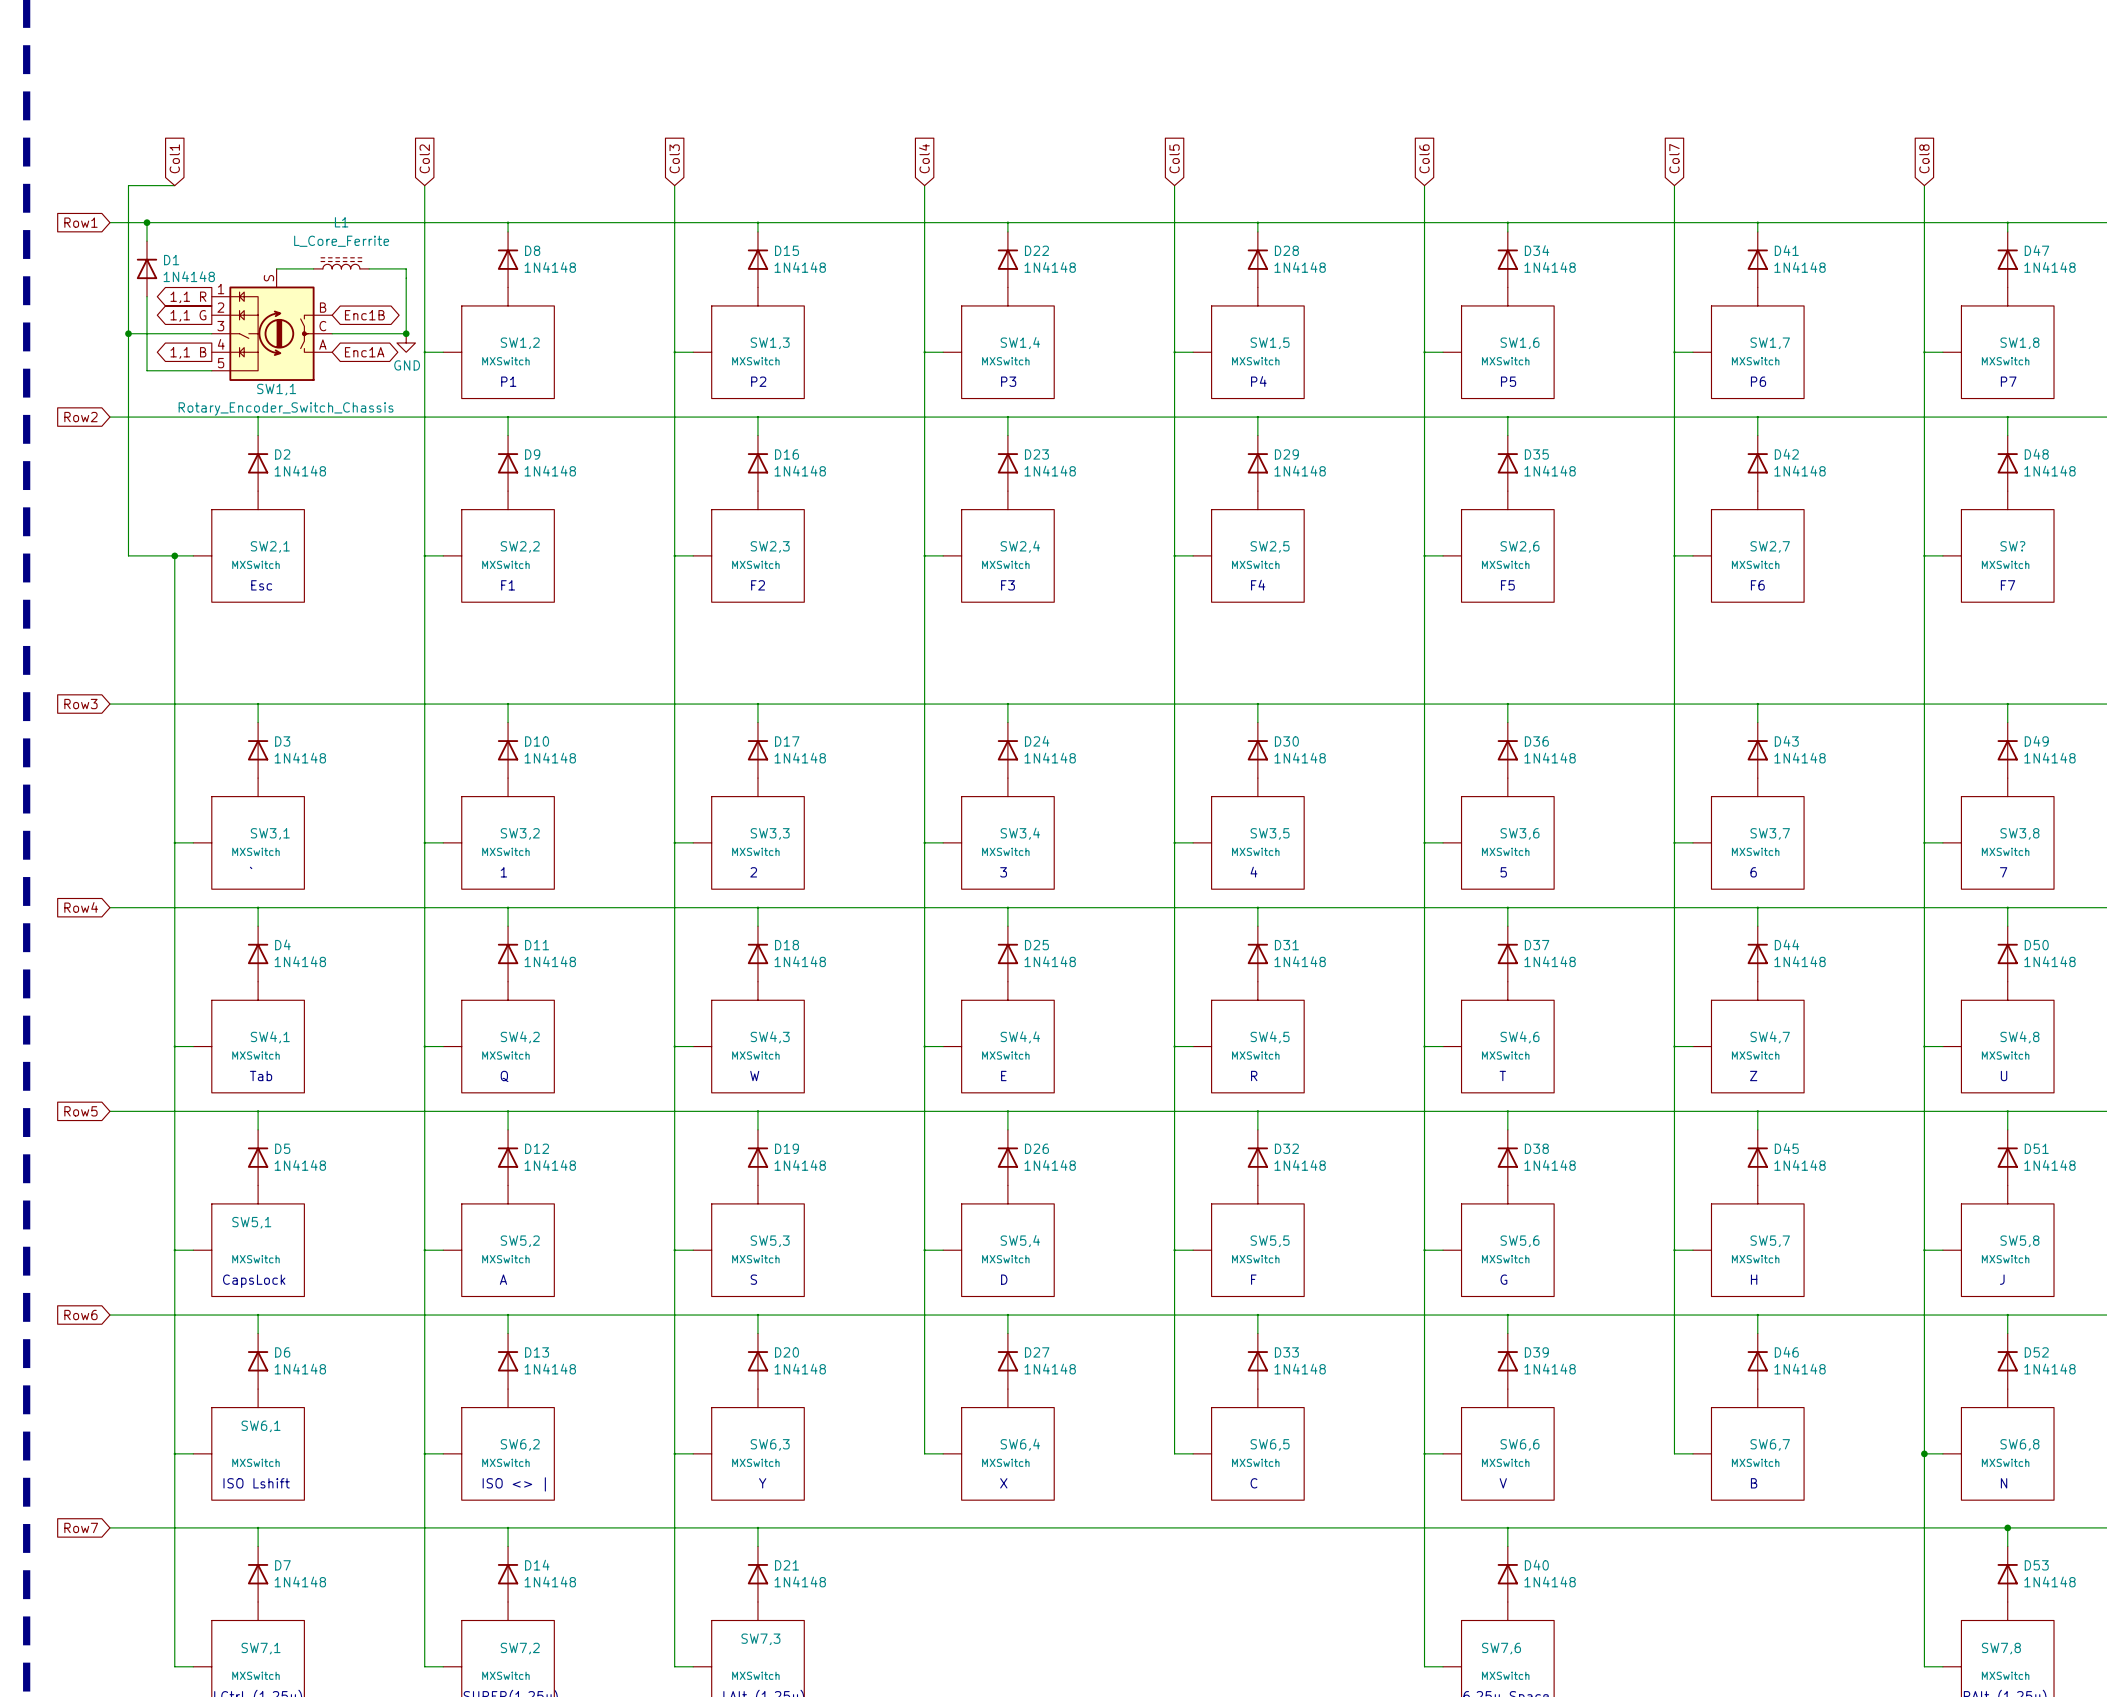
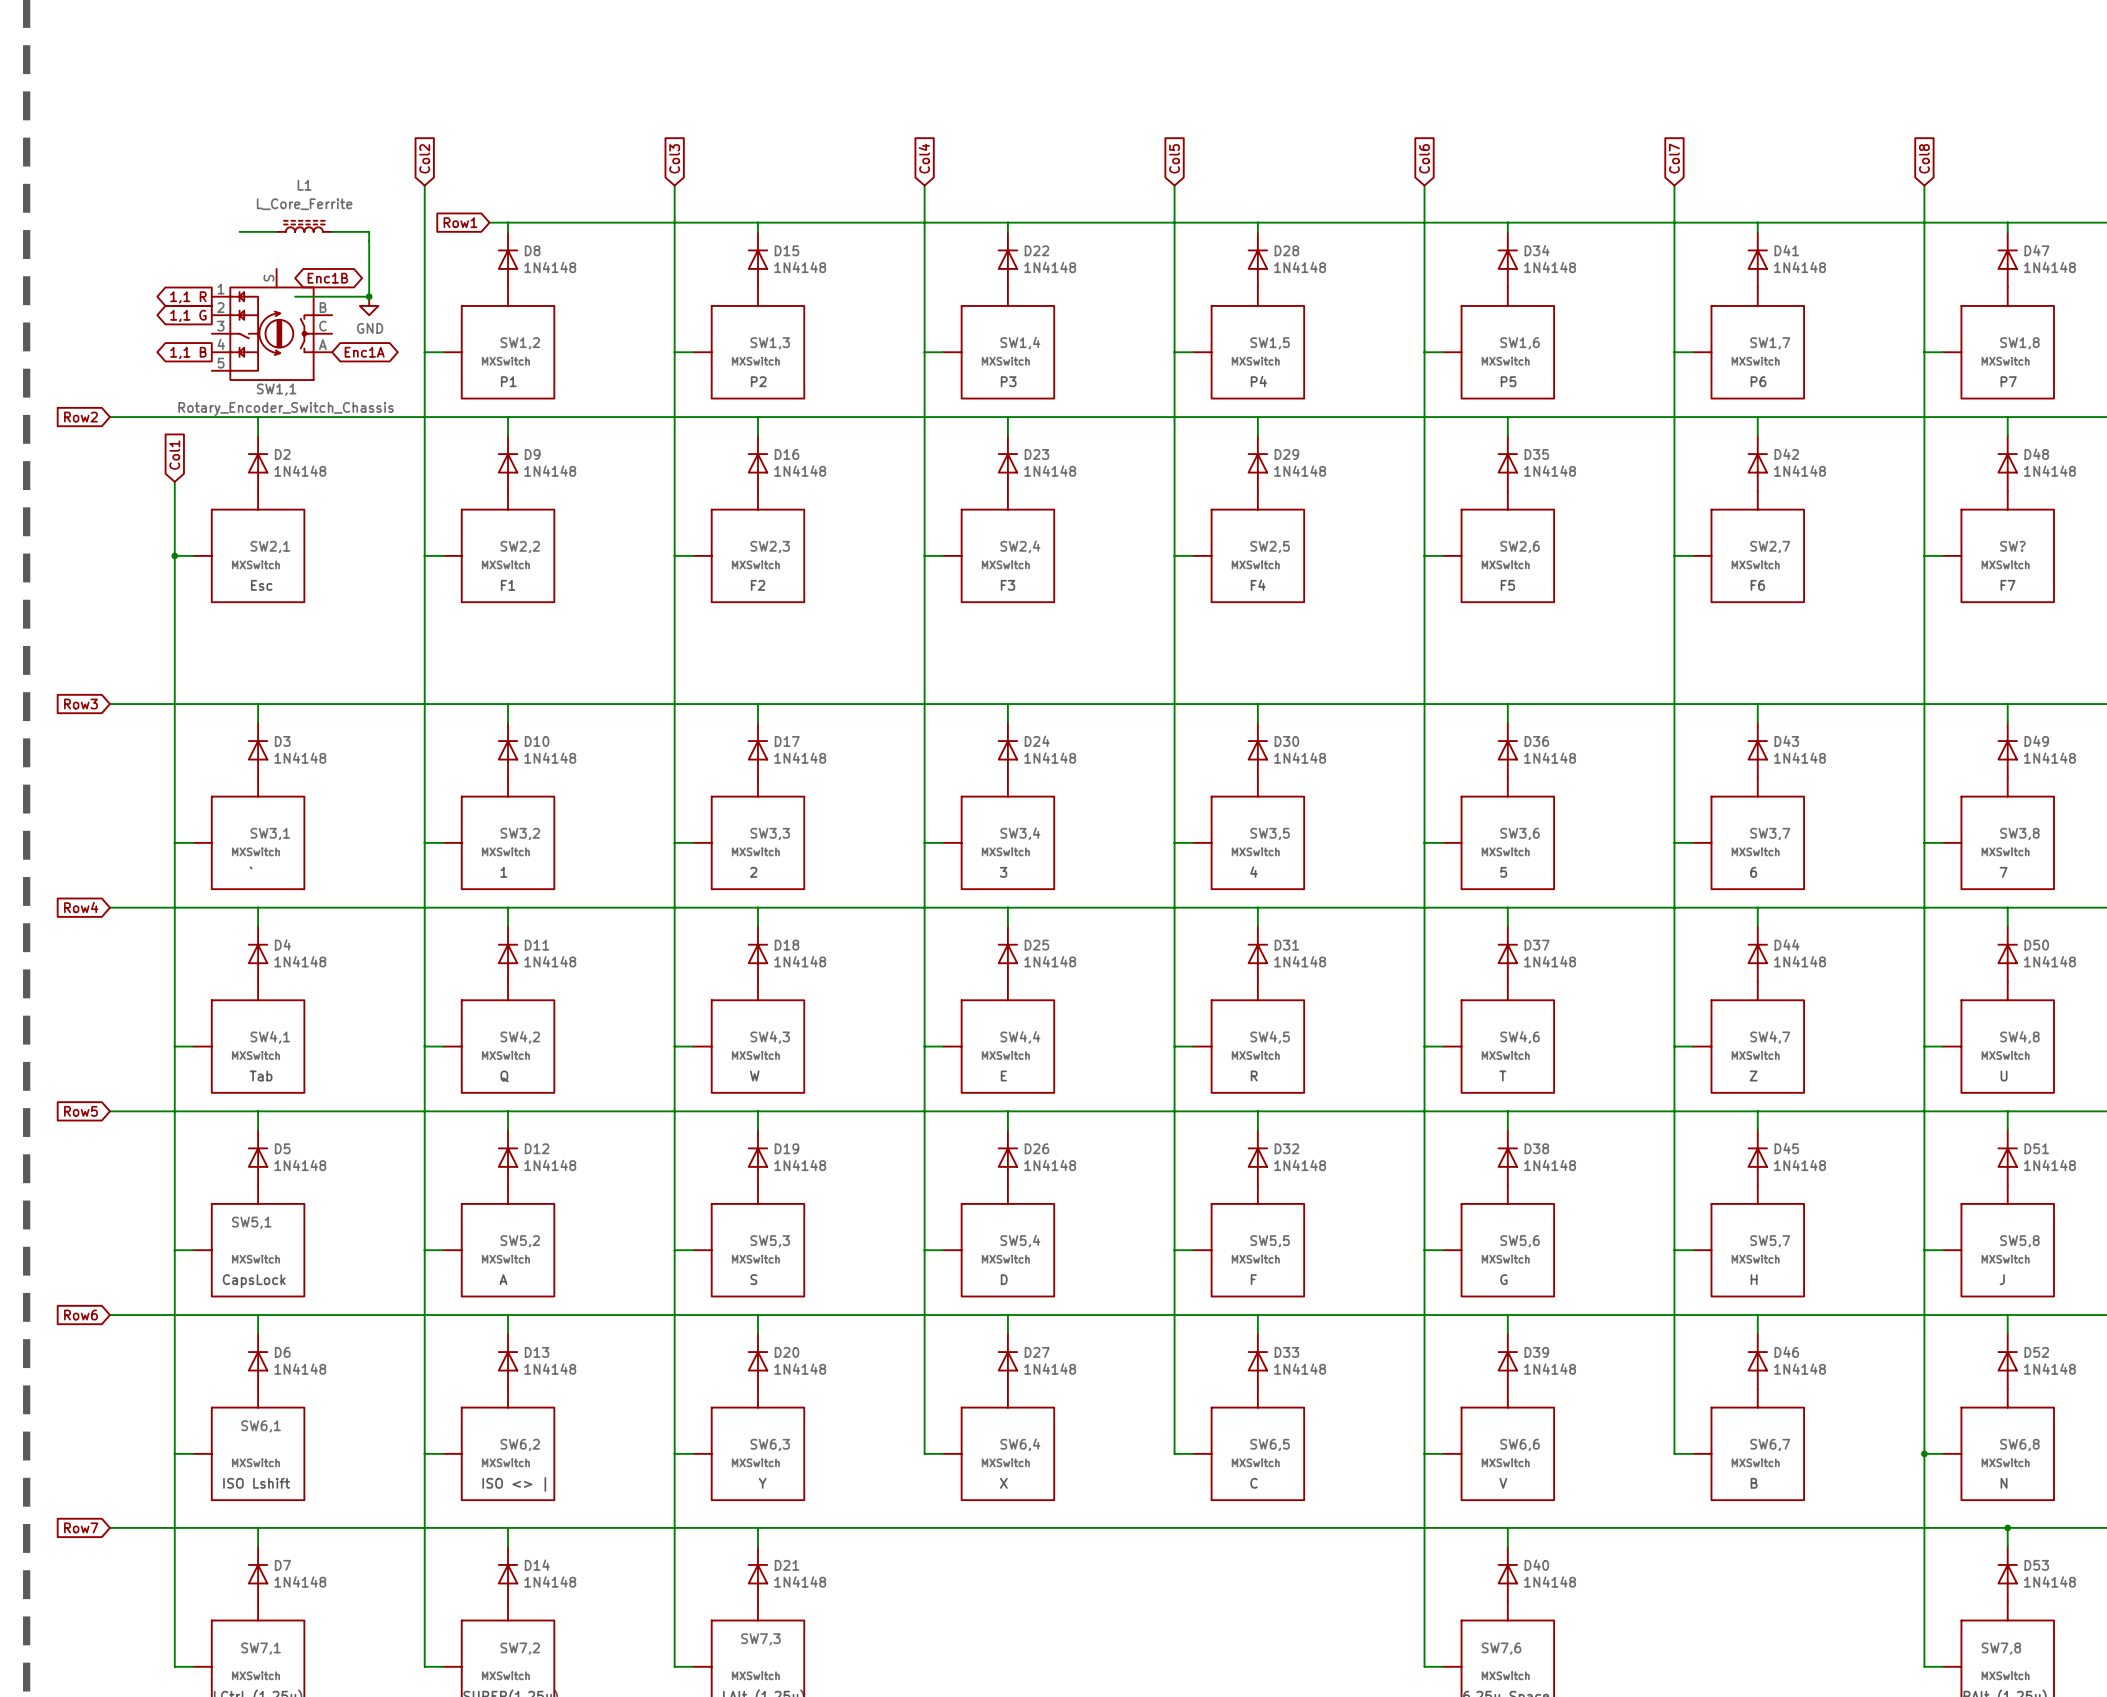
global label: Col1 (174, 158) -> none
wire: (174, 185) (128, 185) (128, 555) (174, 555) -> (174, 481) (174, 555)
global label: Row1 (80, 222) -> none
wire: (109, 222) (489, 222) -> none
wire: (147, 222) (147, 241) -> none
junction: (147, 222) -> none
global label: none -> Row1 (460, 222)
L1 position: (341, 263) -> (304, 226)
D1: 1N4148 (147, 268) -> none
wire: (276, 268) (313, 268) -> (239, 231) (276, 231)
wire: (369, 268) (406, 268) (406, 333) (332, 333) -> (332, 231) (369, 231) (369, 296) (295, 296)
wire: (147, 296) (147, 370) (211, 370) -> none
junction: none -> (369, 296)
global label position: Enc1B (364, 315) -> Enc1B (327, 278)
wire: (128, 333) (211, 333) -> none
junction: (128, 333) -> none
junction: (406, 333) -> none
power symbol position: GND (406, 342) -> GND (369, 305)
global label: none -> Col1 (174, 455)

